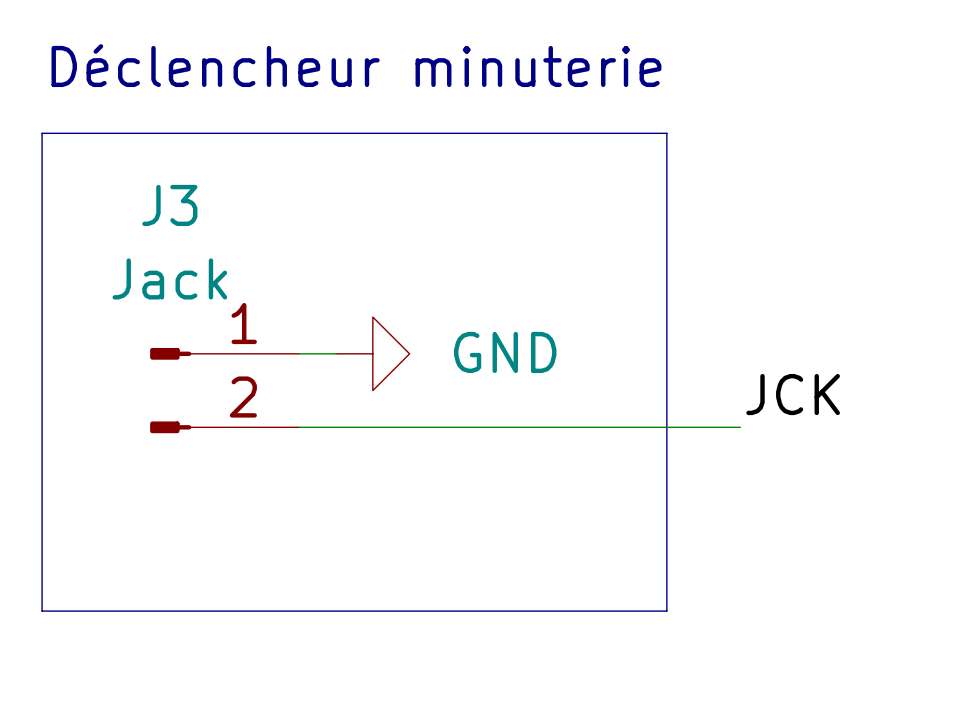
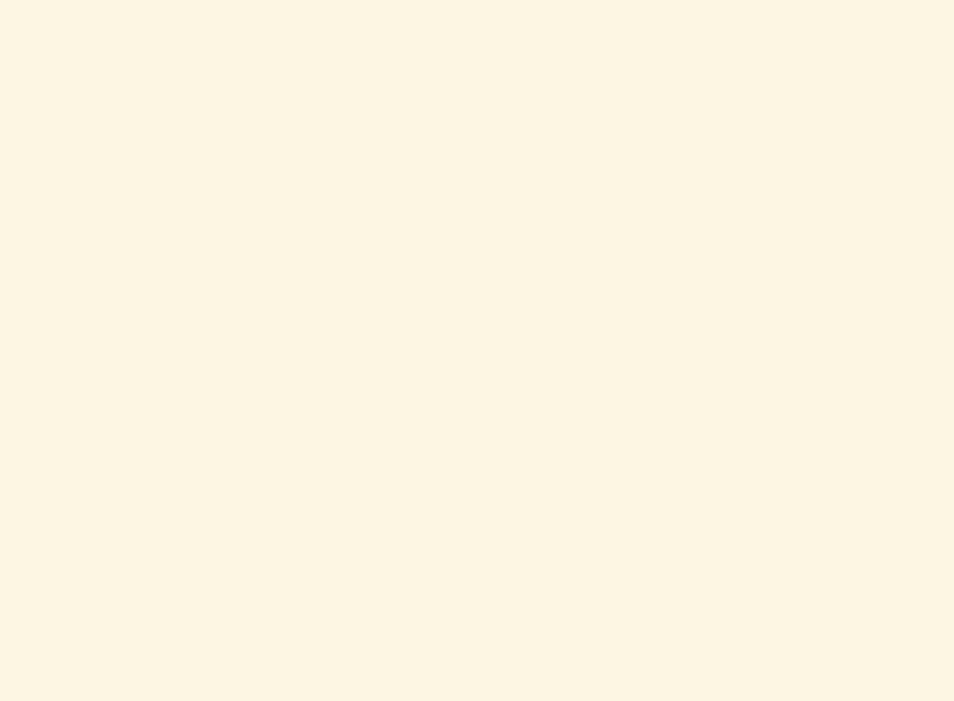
text: Déclencheur minuterie (356, 65) -> none
line: (42, 133) (42, 611) (666, 611) (666, 133) (42, 133) -> none
wire: (299, 353) (336, 353) -> none
power symbol: GND (372, 353) -> none
J3: Jack (224, 390) -> none
label: JCK (793, 394) -> none
wire: (299, 427) (740, 427) -> none

